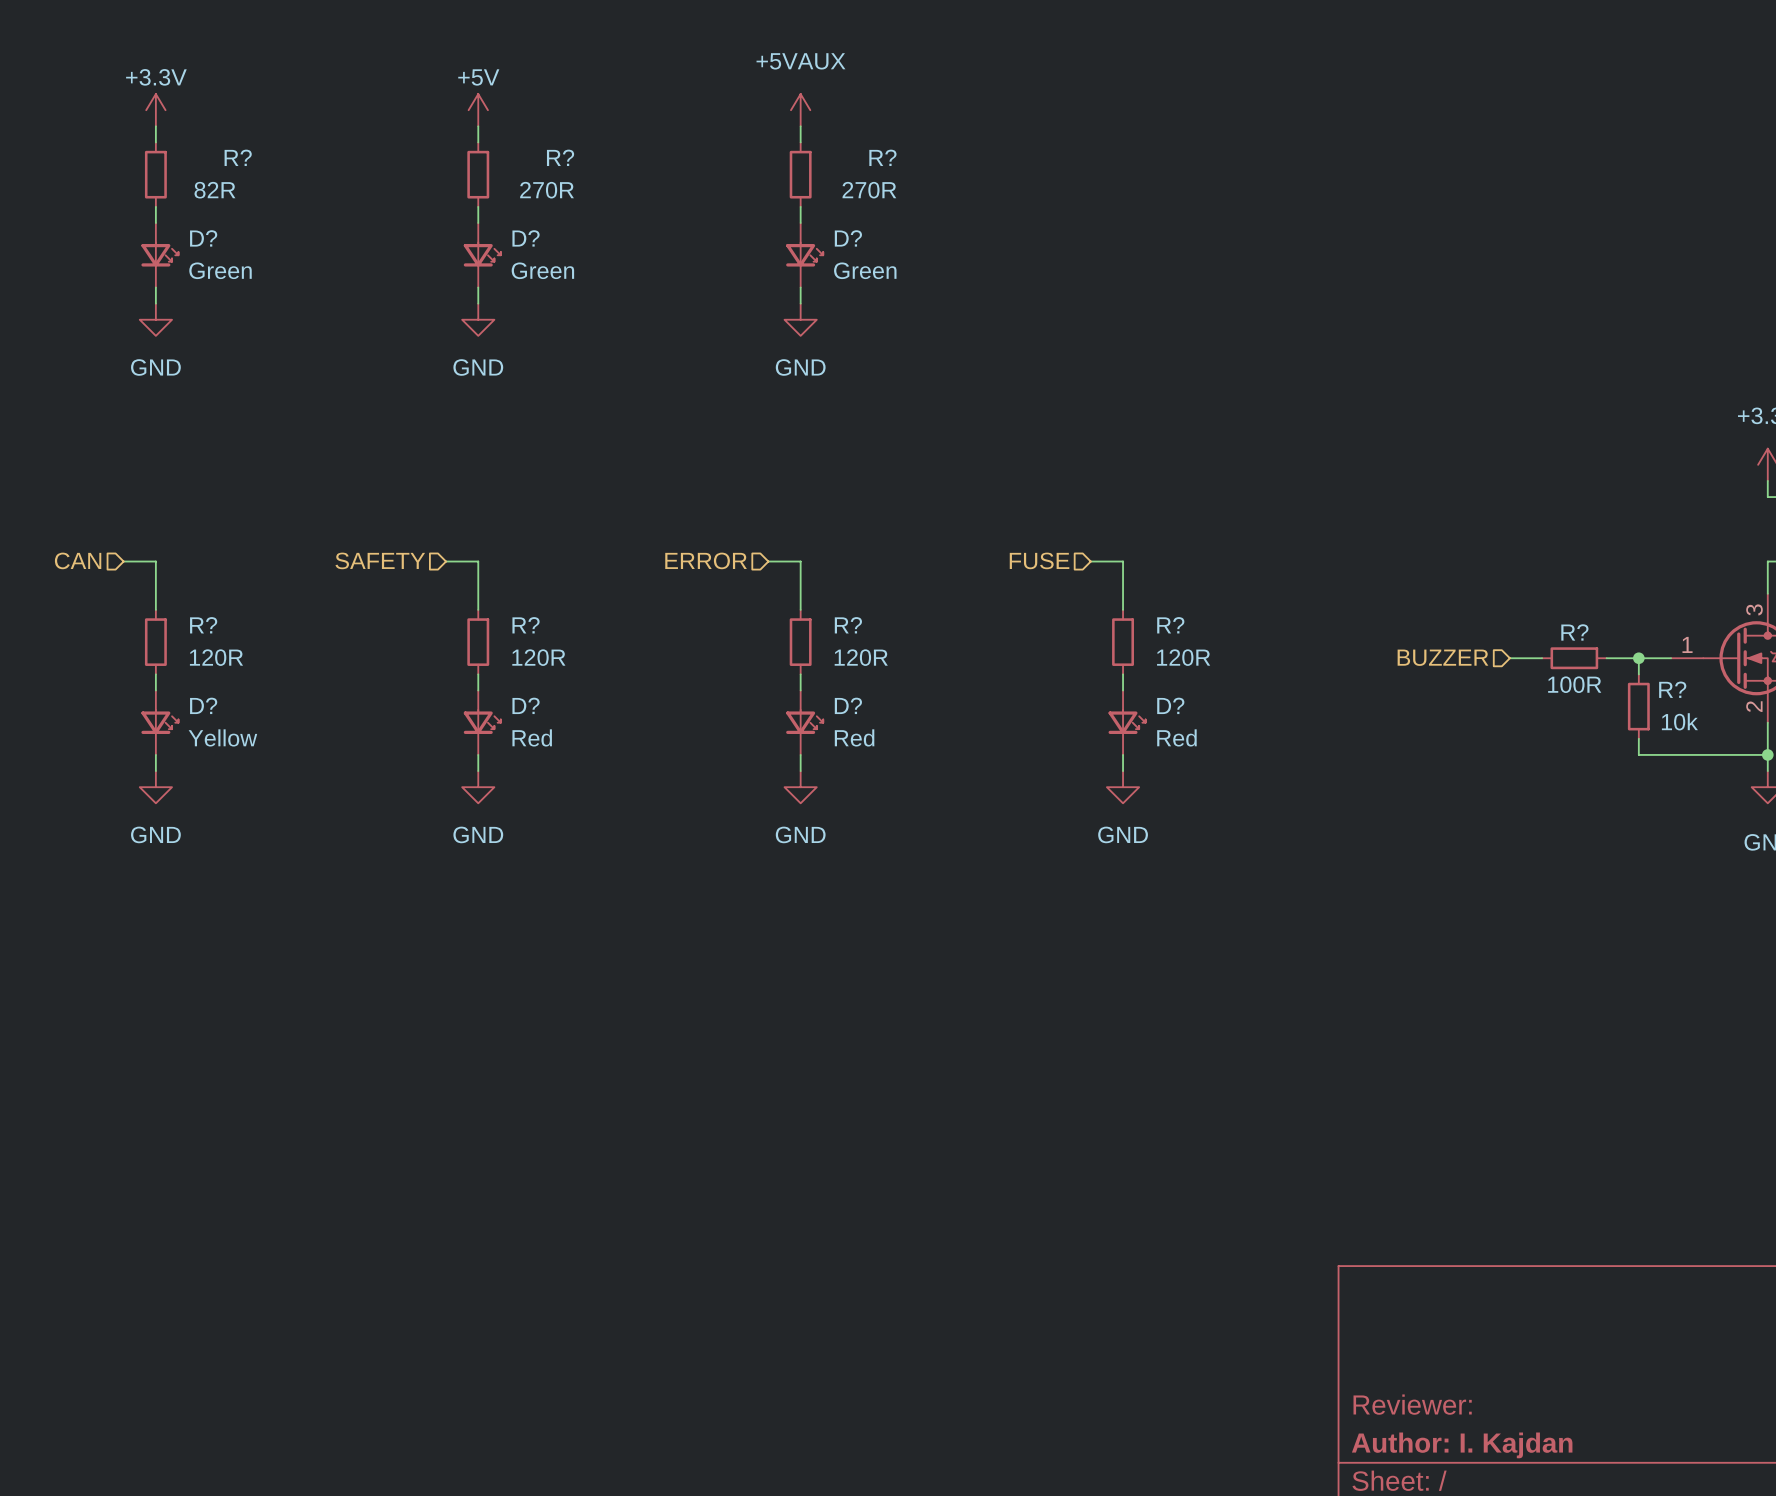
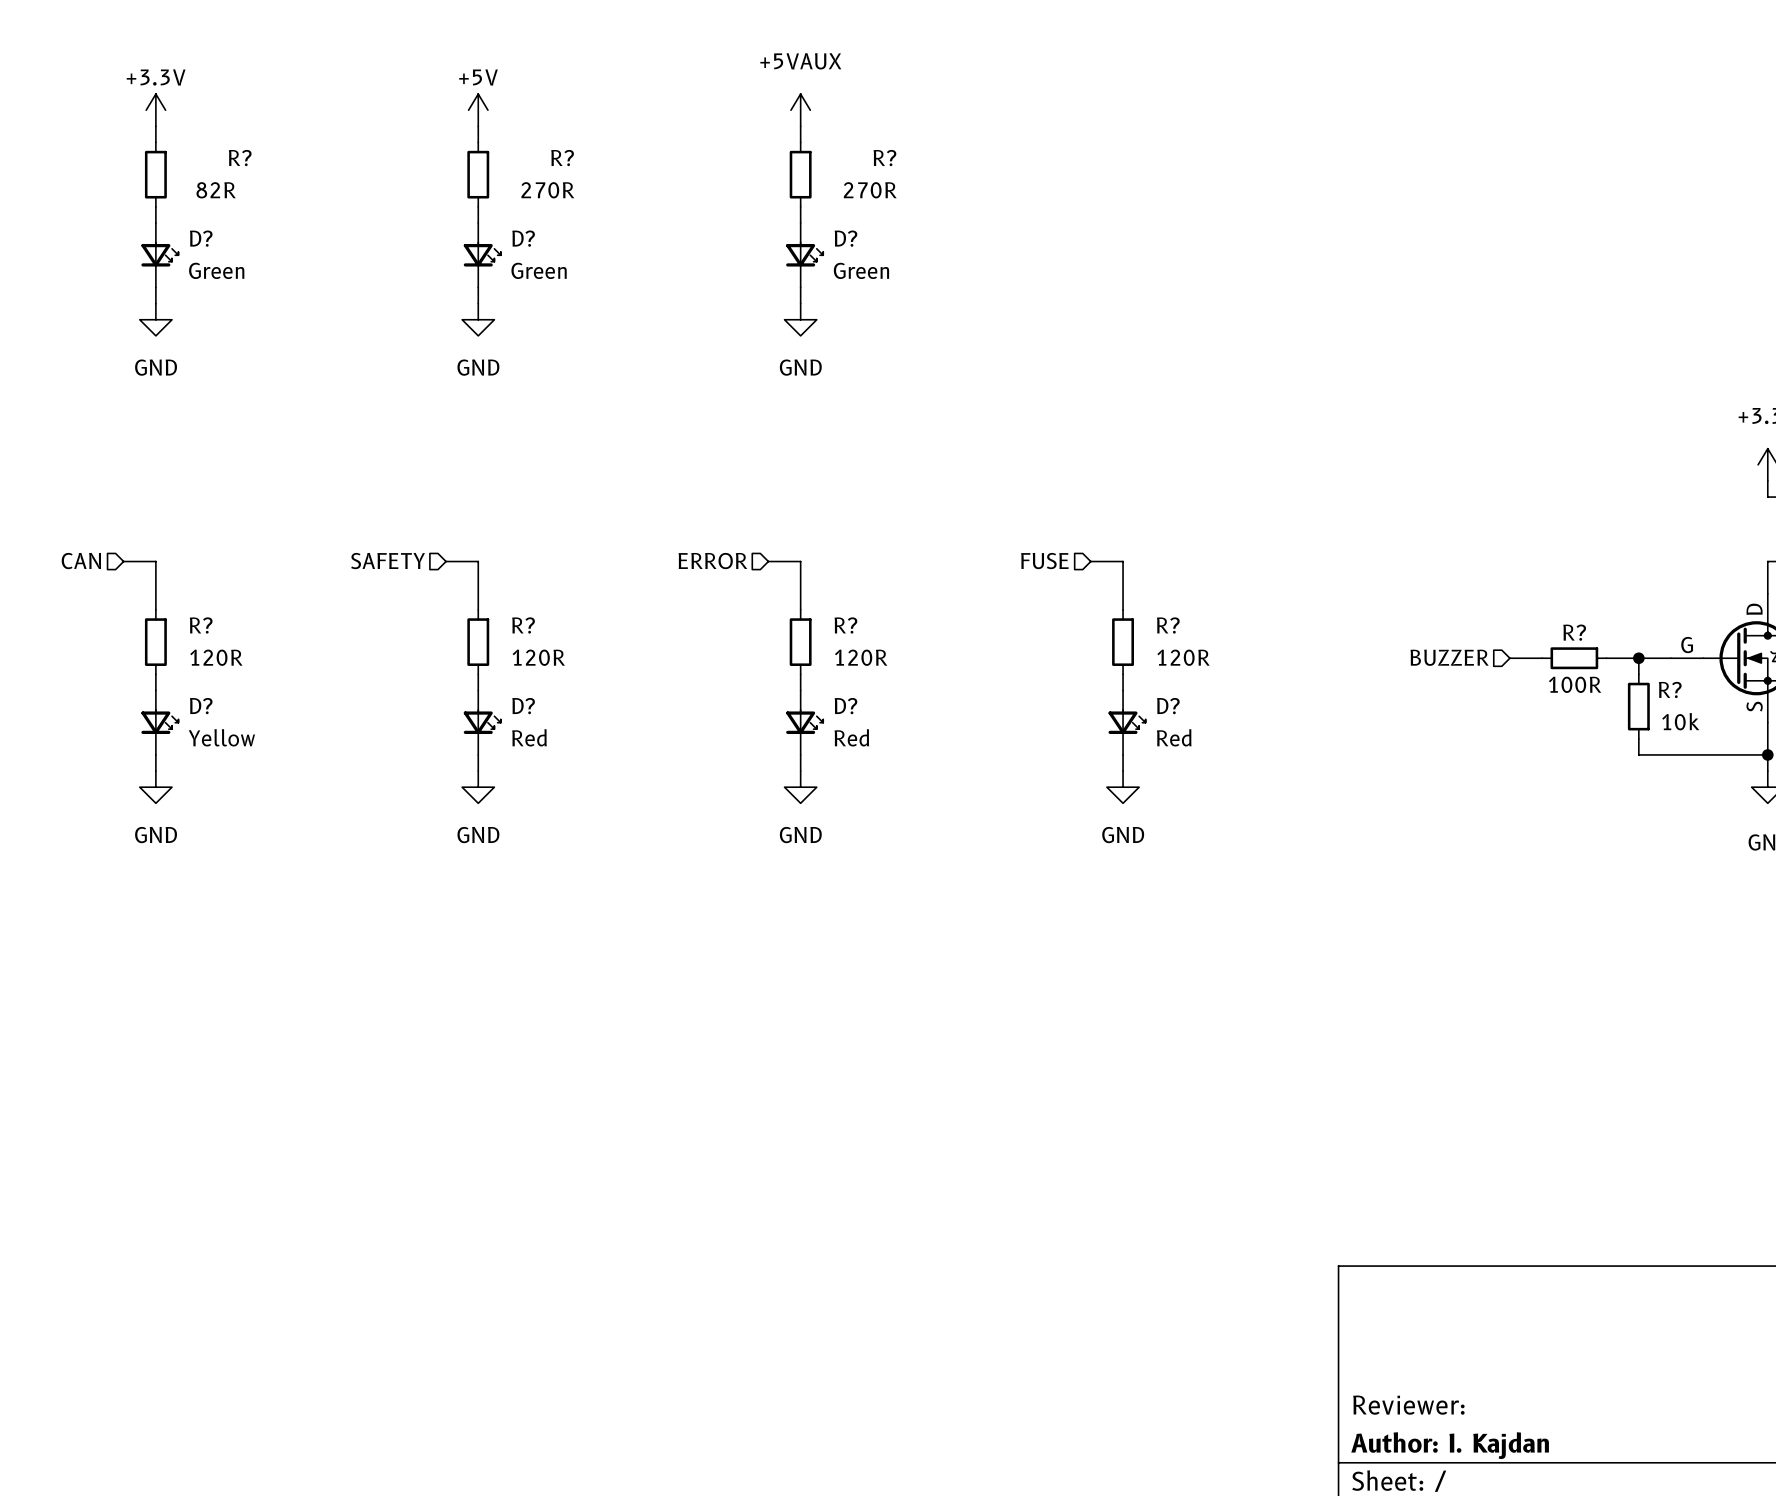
part pin name: none -> D (1754, 609)
part pin number: 3 (1754, 609) -> none
part pin name: none -> G (1687, 645)
part pin number: 1 (1687, 644) -> none
part pin name: none -> S (1754, 706)
part pin number: 2 (1754, 706) -> none

